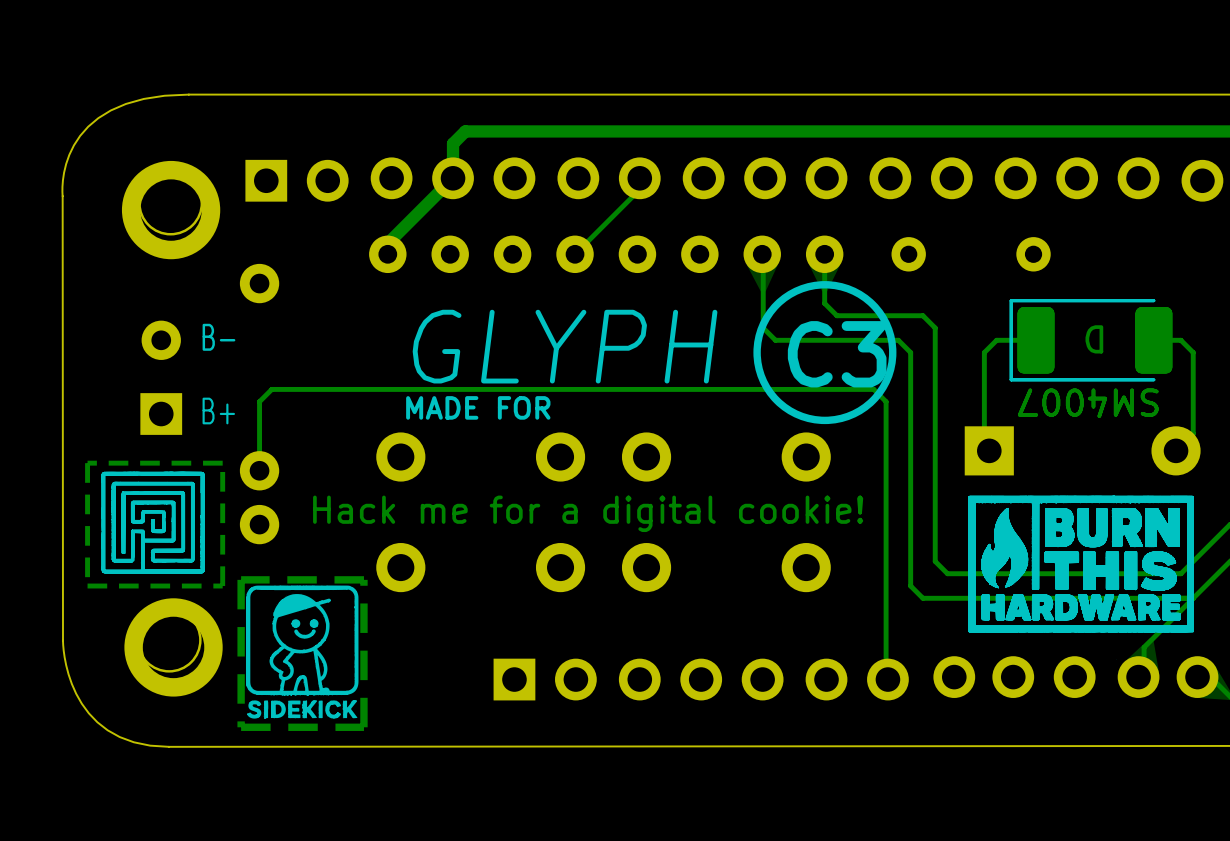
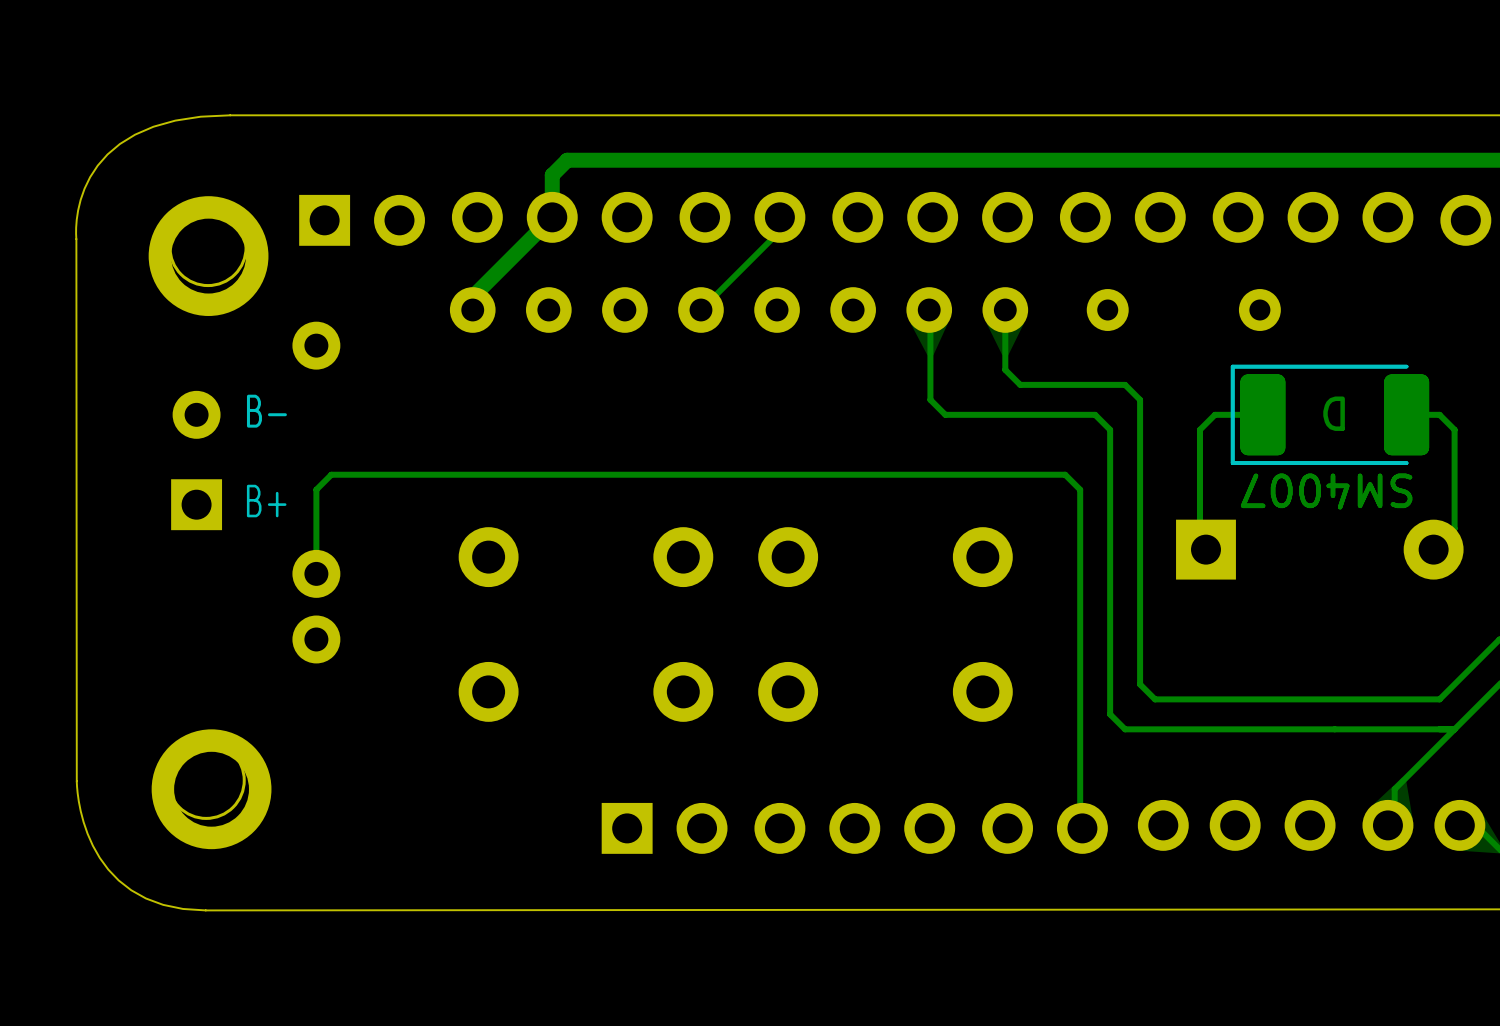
drawing: [753, 281, 897, 425] -> none
text: GLYPH (565, 346) -> none
text: C3 (837, 354) -> none
text: MADE FOR (478, 407) -> none
track: (222, 463) (87, 463) (87, 586) (222, 586) (222, 463) -> none
drawing: [101, 471, 205, 574] -> none
drawing: [968, 495, 1194, 660] -> none
text: Hack me for a digital cookie! (588, 513) -> none
track: (363, 579) (241, 579) (241, 727) (363, 727) (363, 579) -> none
drawing: [246, 585, 359, 719] -> none

